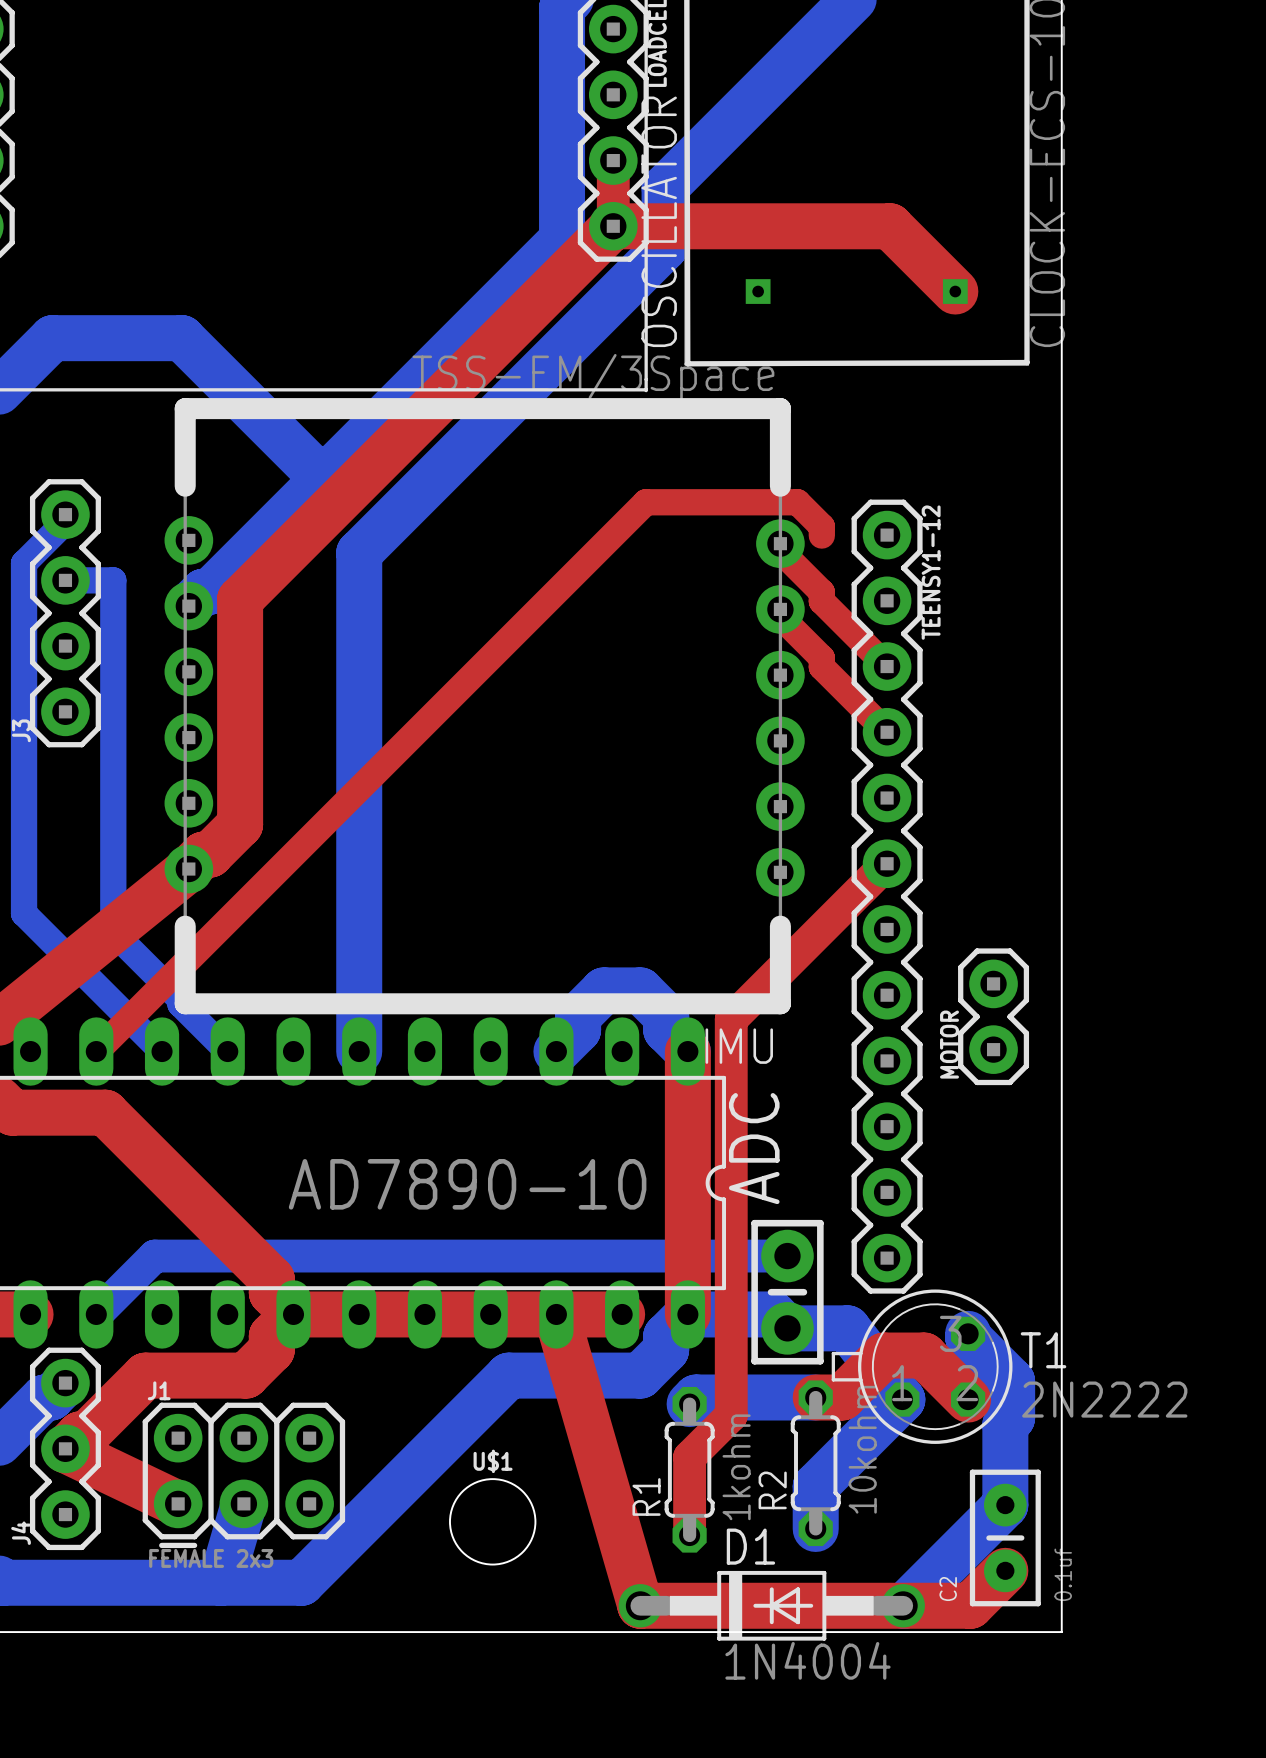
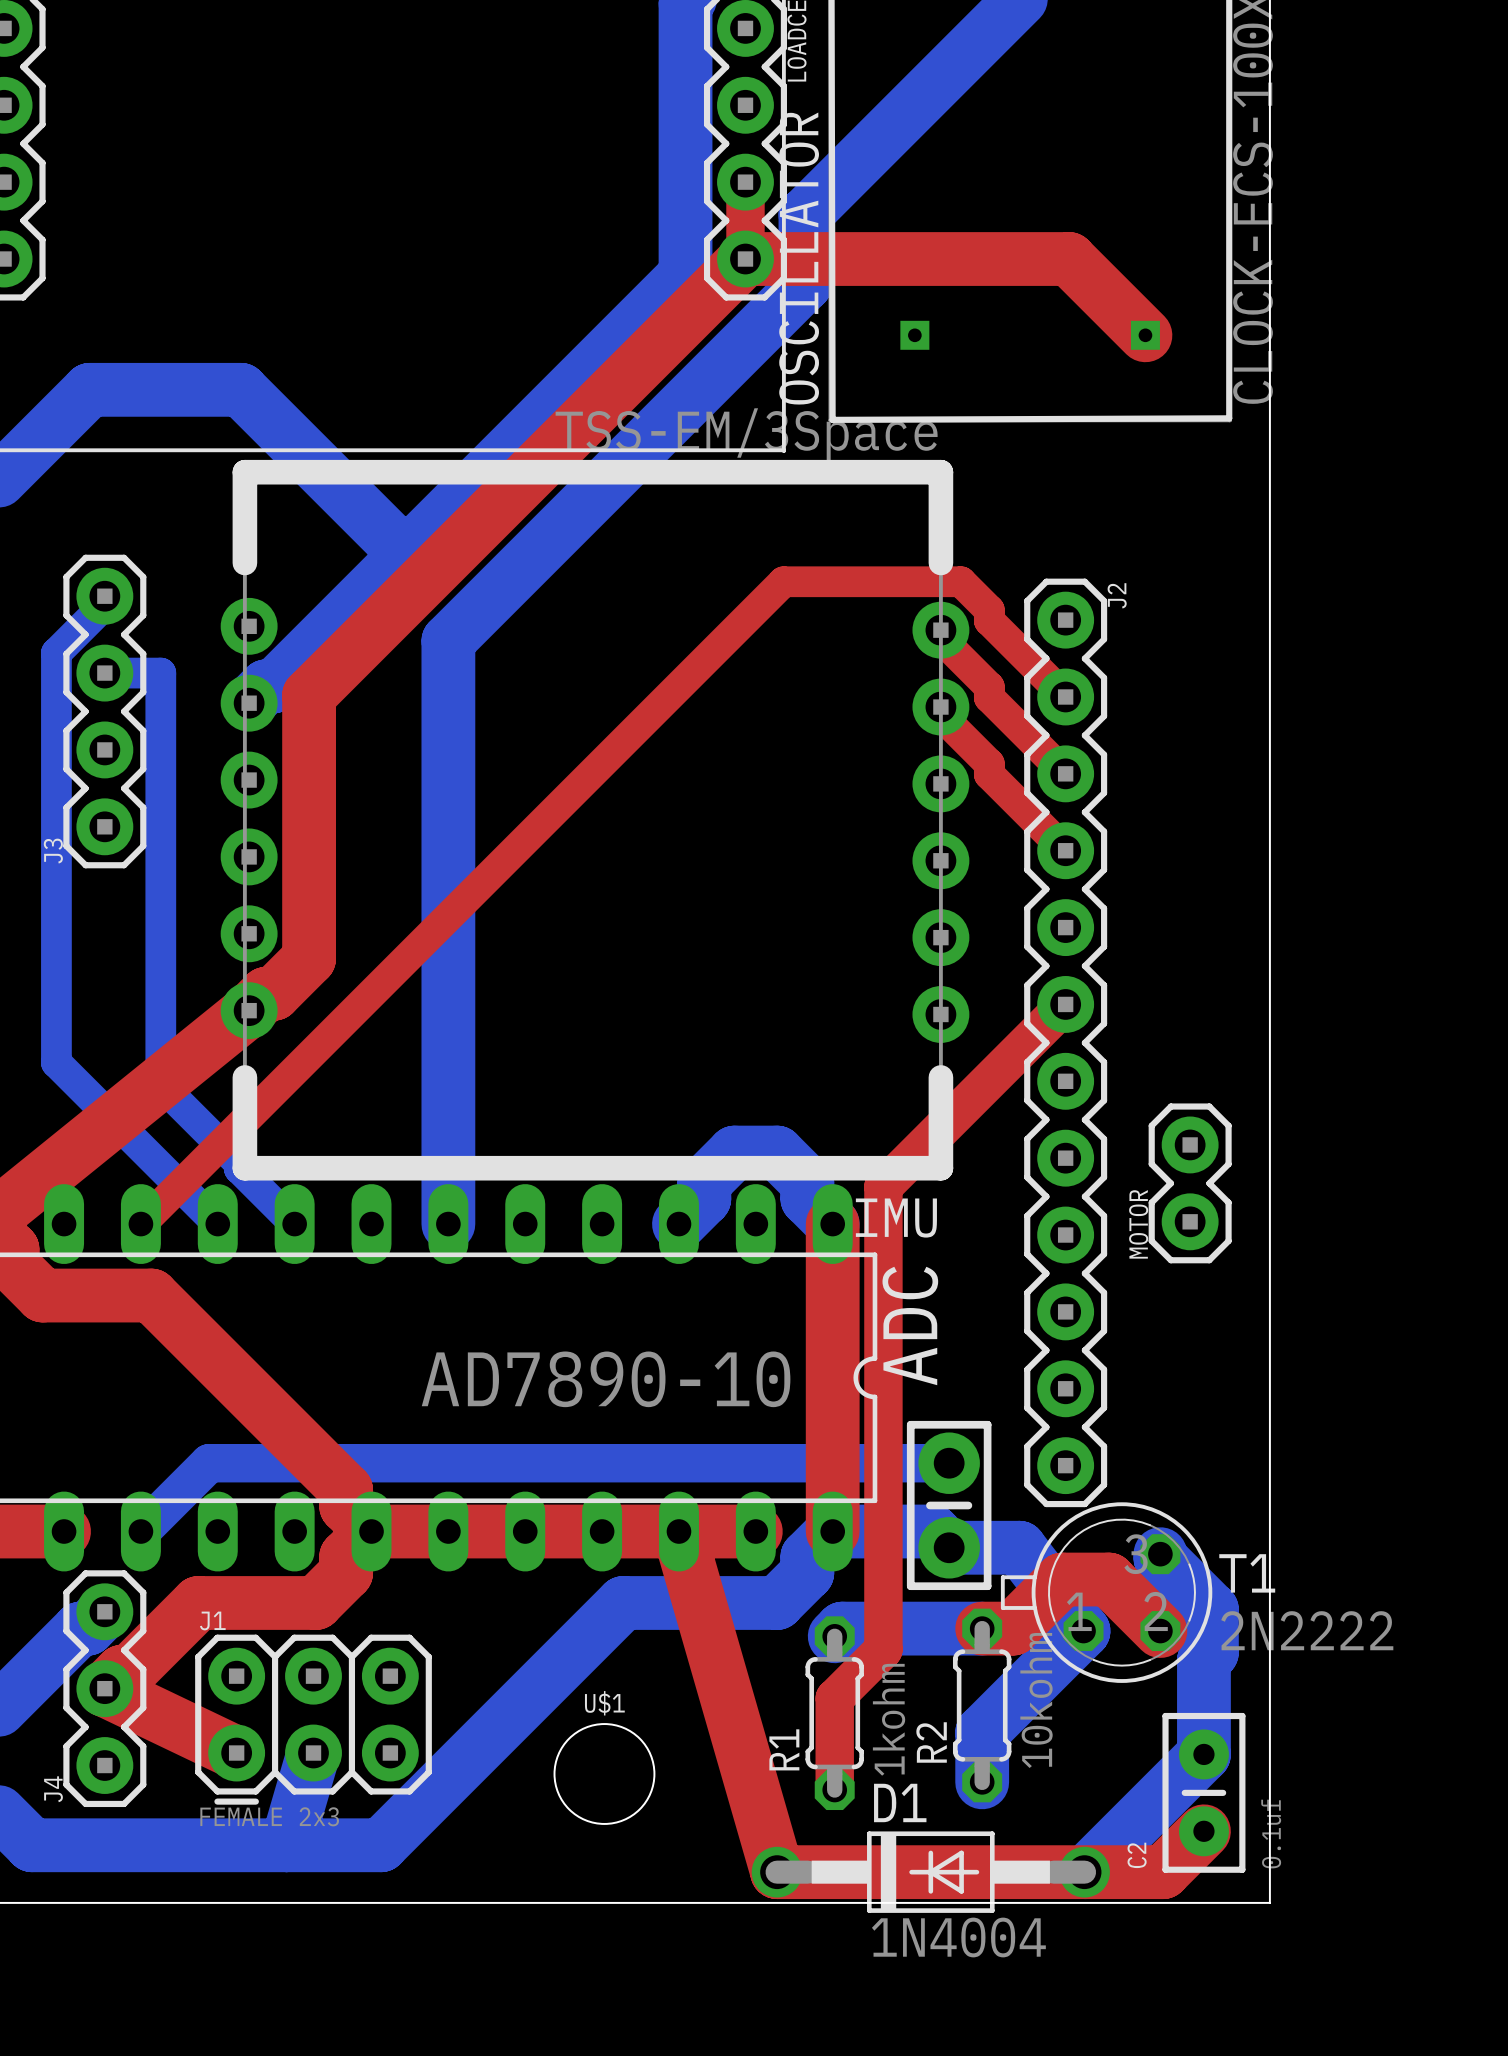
top track: none -> (989, 620) (1065, 696)
TEENSY1-12 name: TEENSY1-12 (931, 572) -> J2 (1117, 595)

